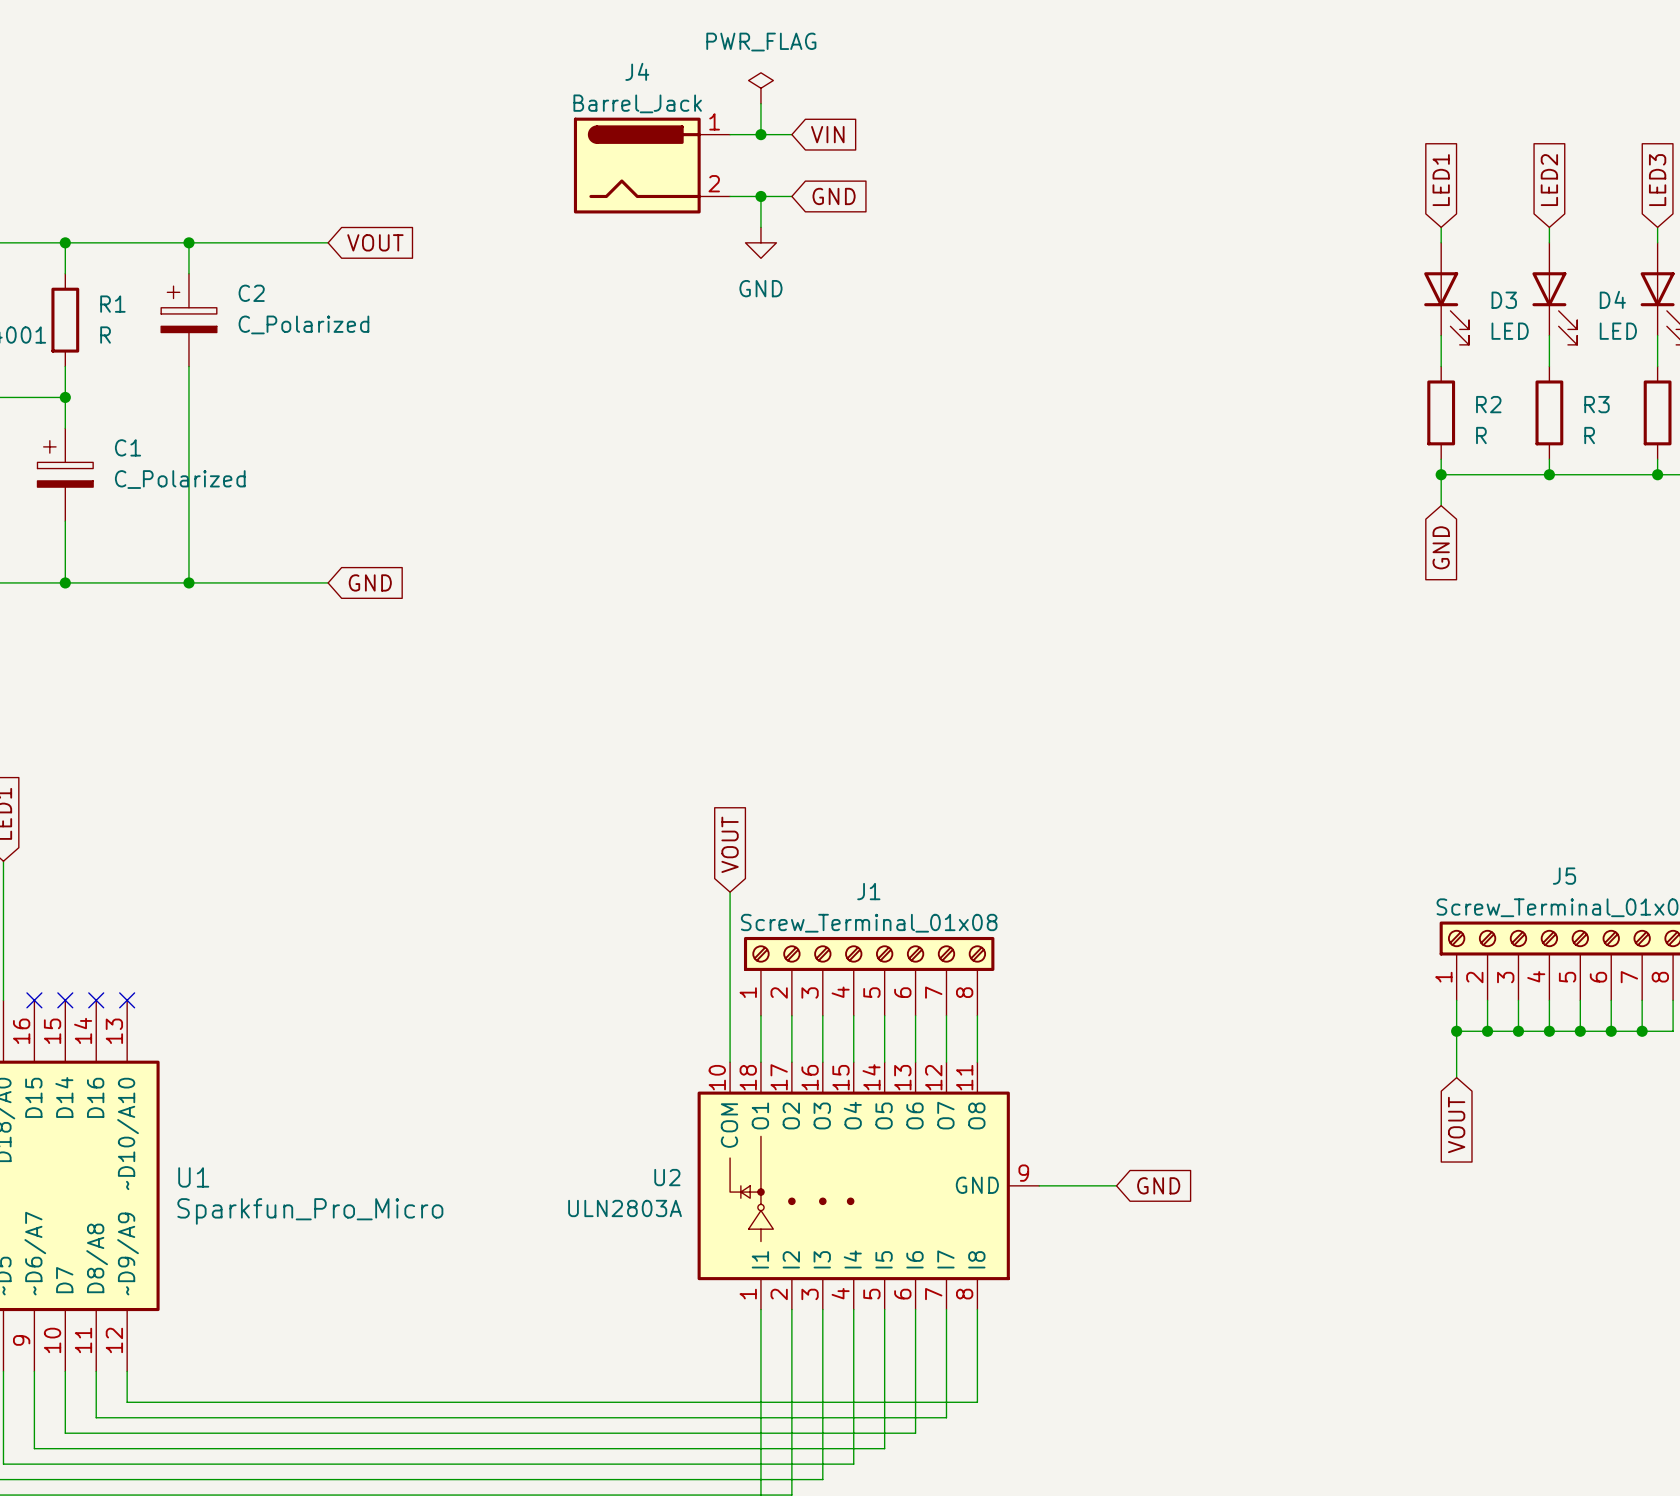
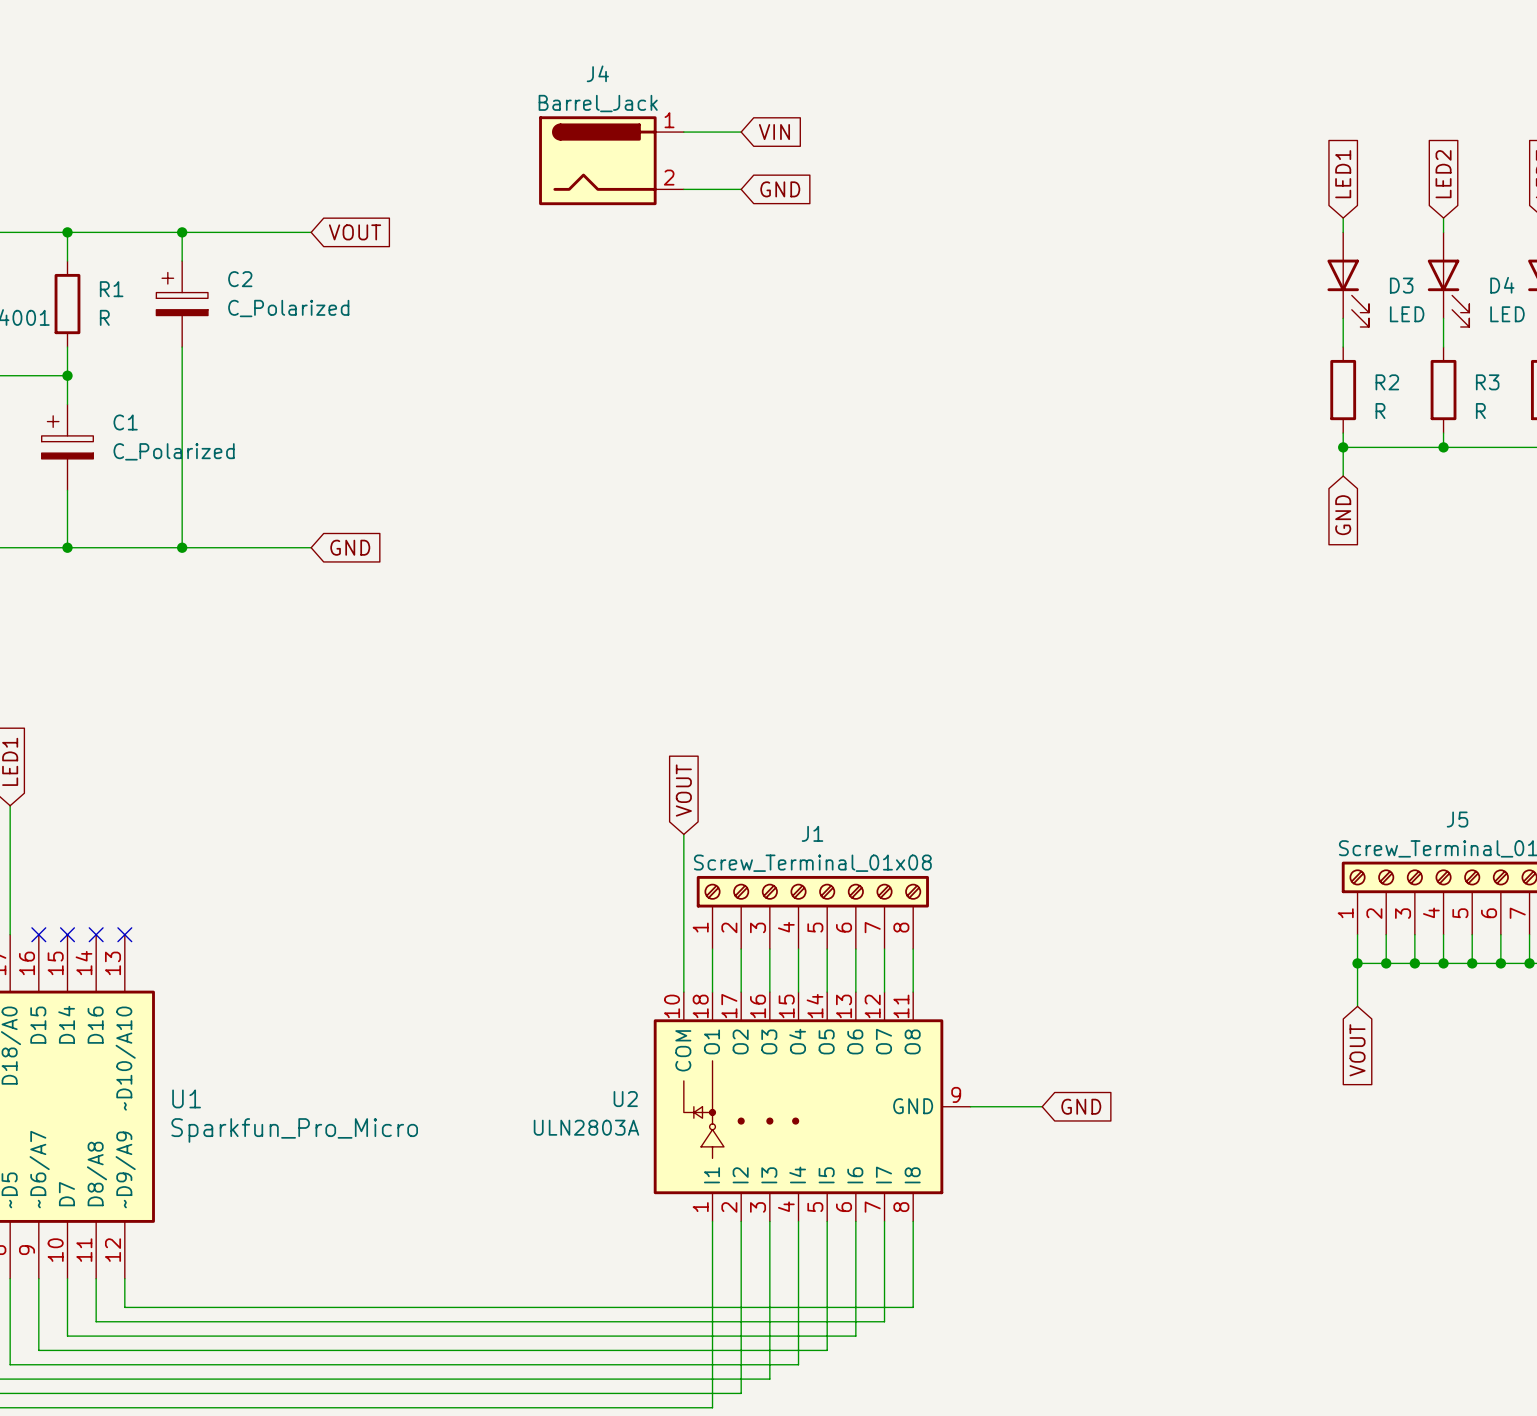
power symbol: PWR_FLAG (760, 88) -> none
wire: (760, 103) (760, 134) -> none
junction: (760, 134) -> none
wire: (760, 196) (760, 227) -> none
junction: (760, 196) -> none
power symbol: GND (760, 242) -> none

